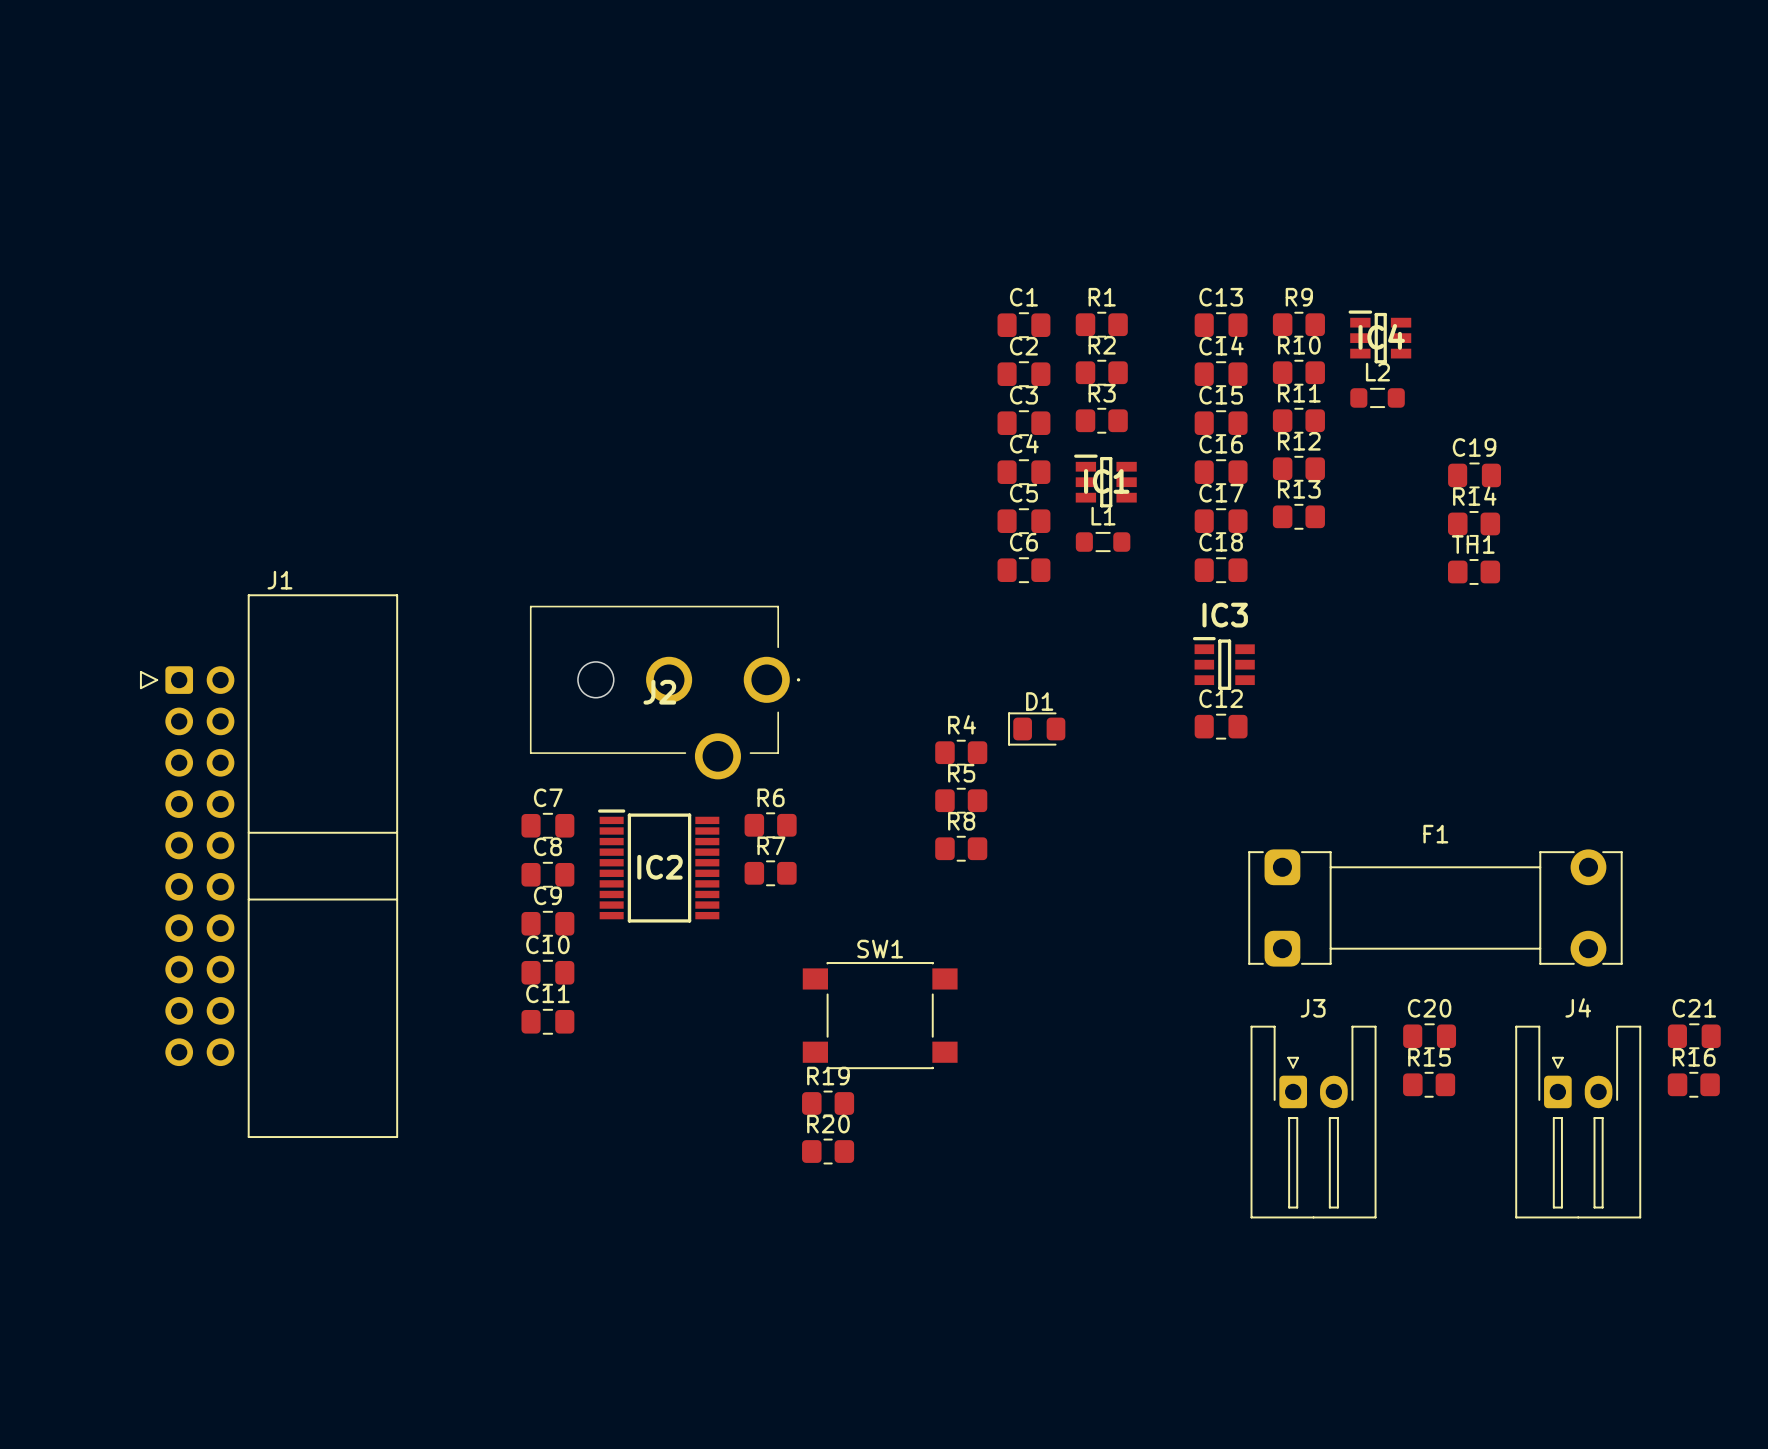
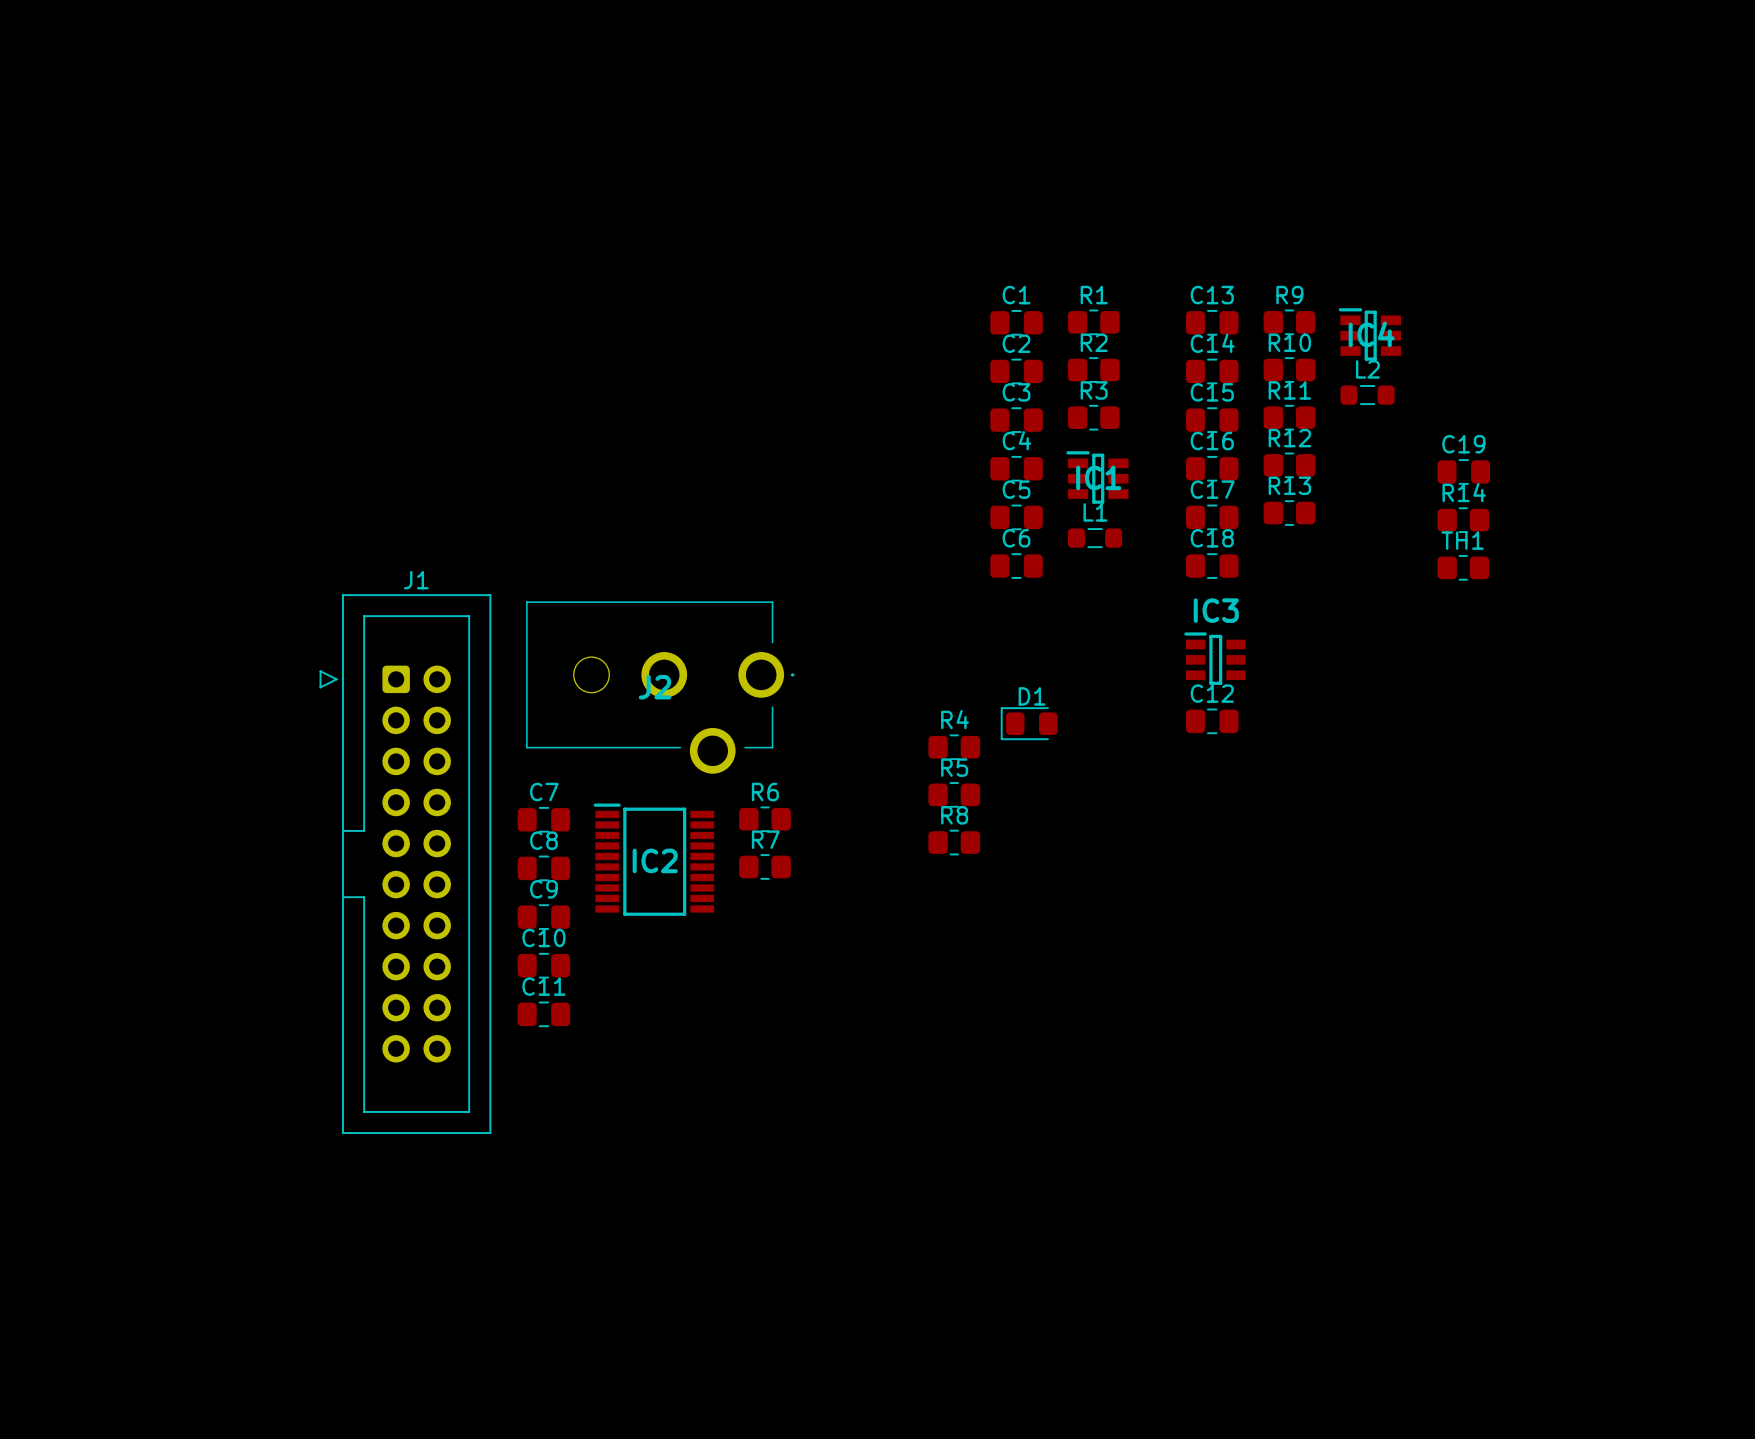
J1 footprint: [139, 594, 399, 1139] -> [319, 594, 492, 1134]
F1: (1435, 907) -> none
SW1: (880, 1015) -> none
C20: (1429, 1036) -> none
C21: (1694, 1036) -> none
R15: (1429, 1084) -> none
R16: (1693, 1084) -> none
R19: (828, 1103) -> none
J3: (1313, 1122) -> none
J4: (1578, 1122) -> none
R20: (828, 1151) -> none

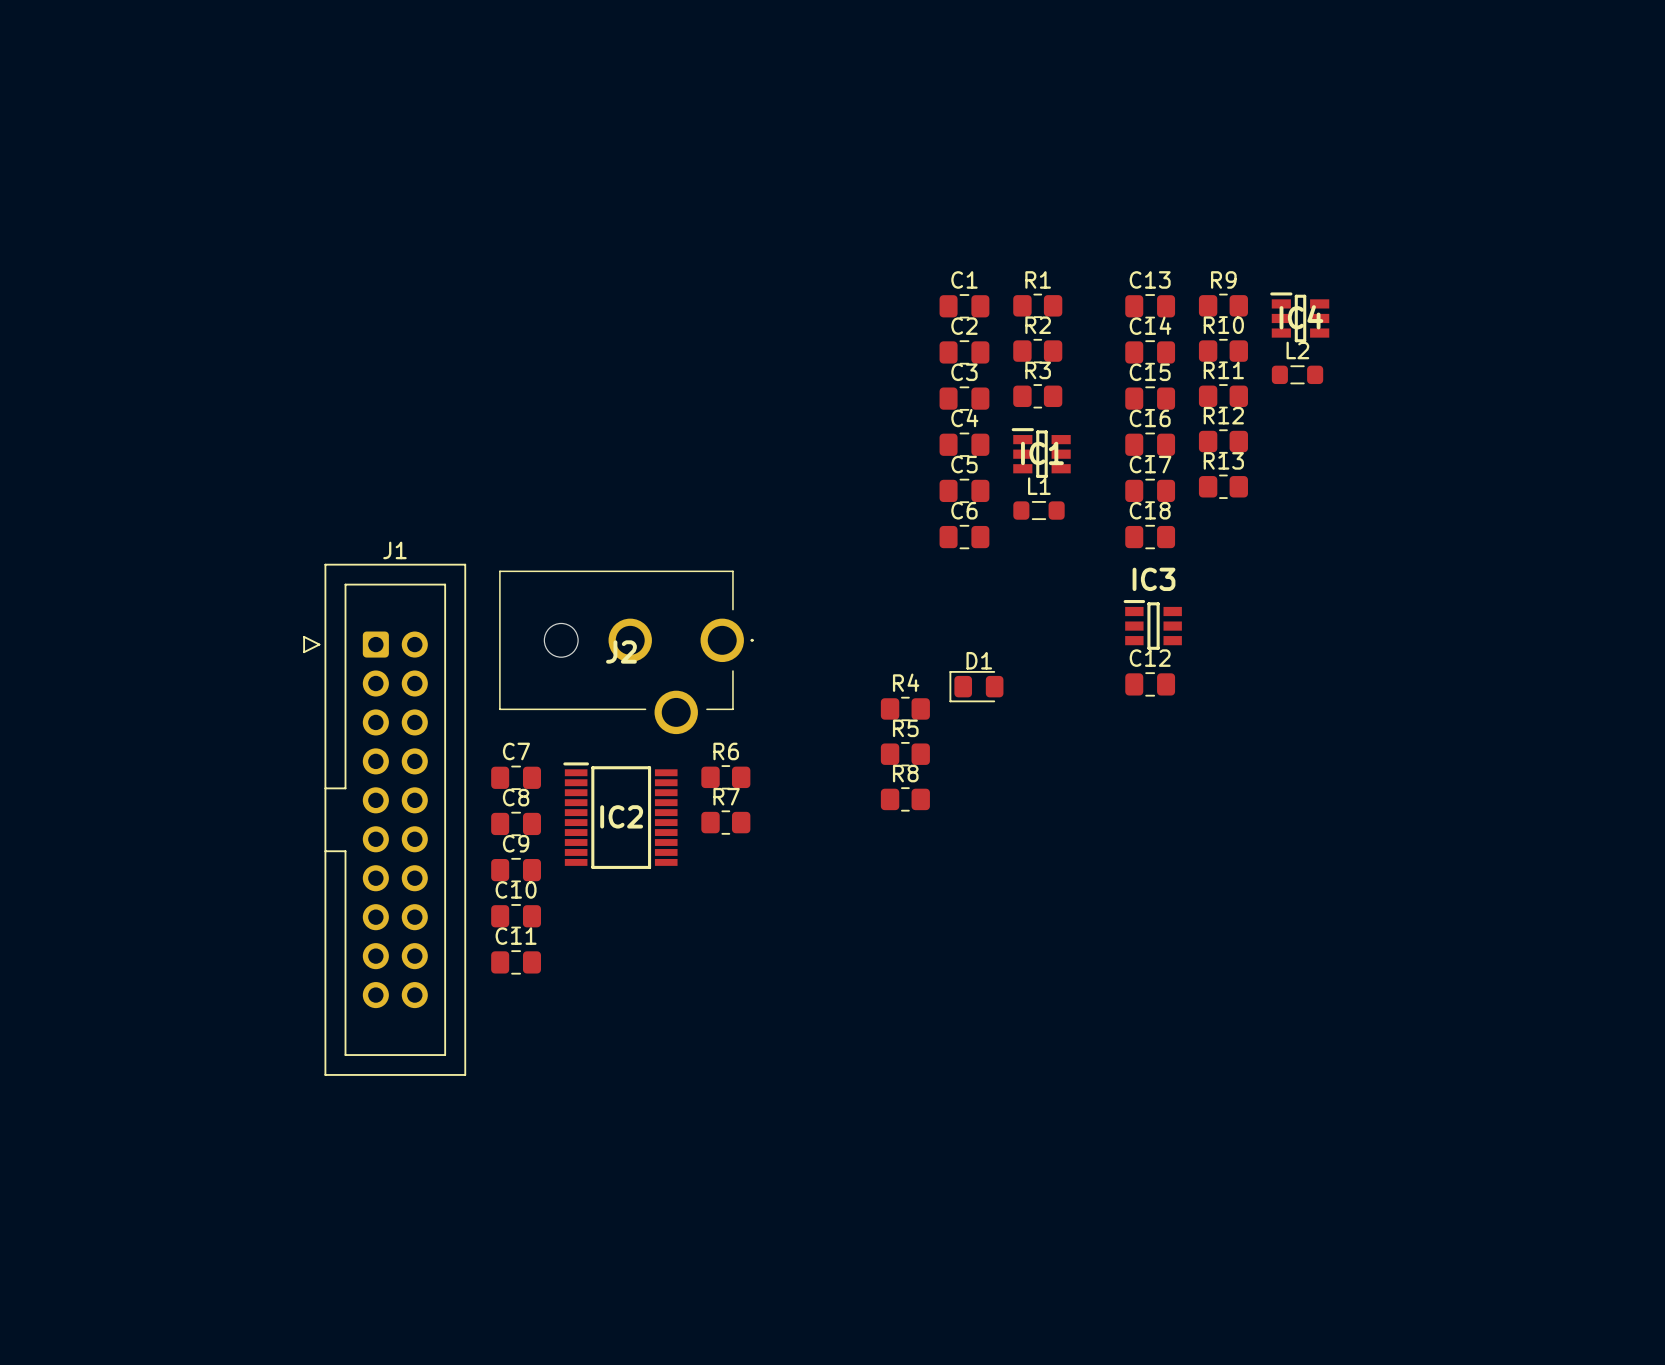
C19: (1463, 471) -> none
R14: (1463, 520) -> none
TH1: (1463, 567) -> none

